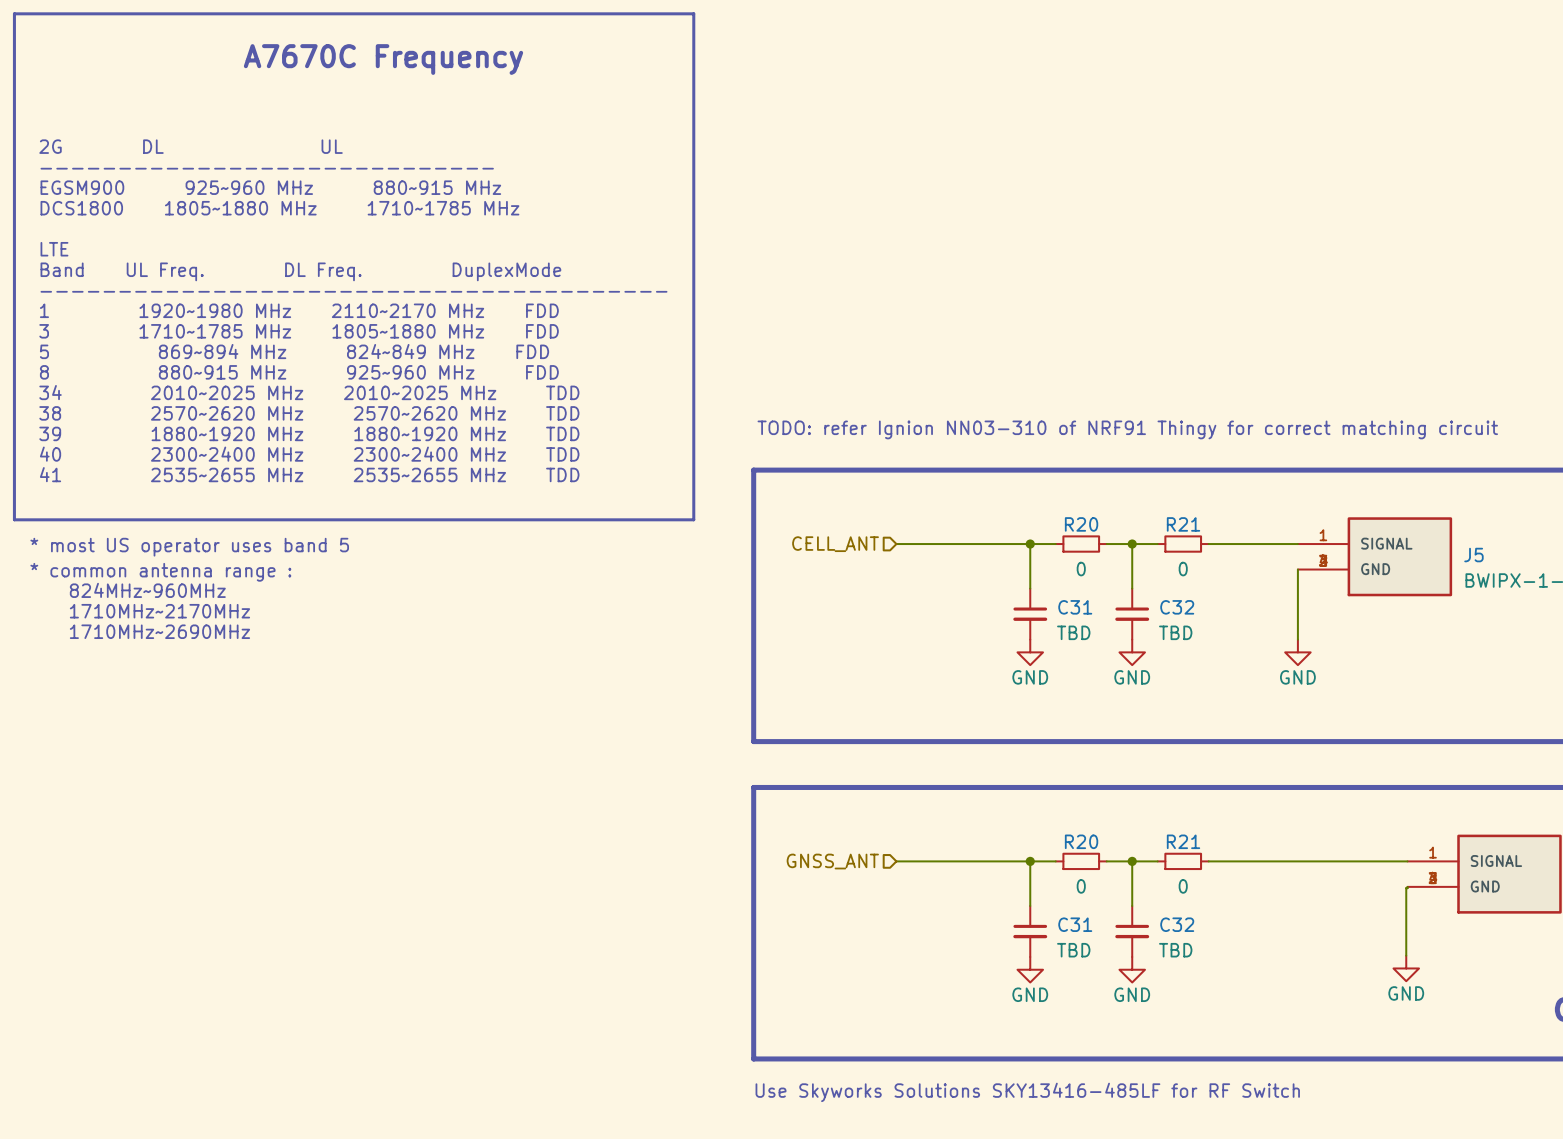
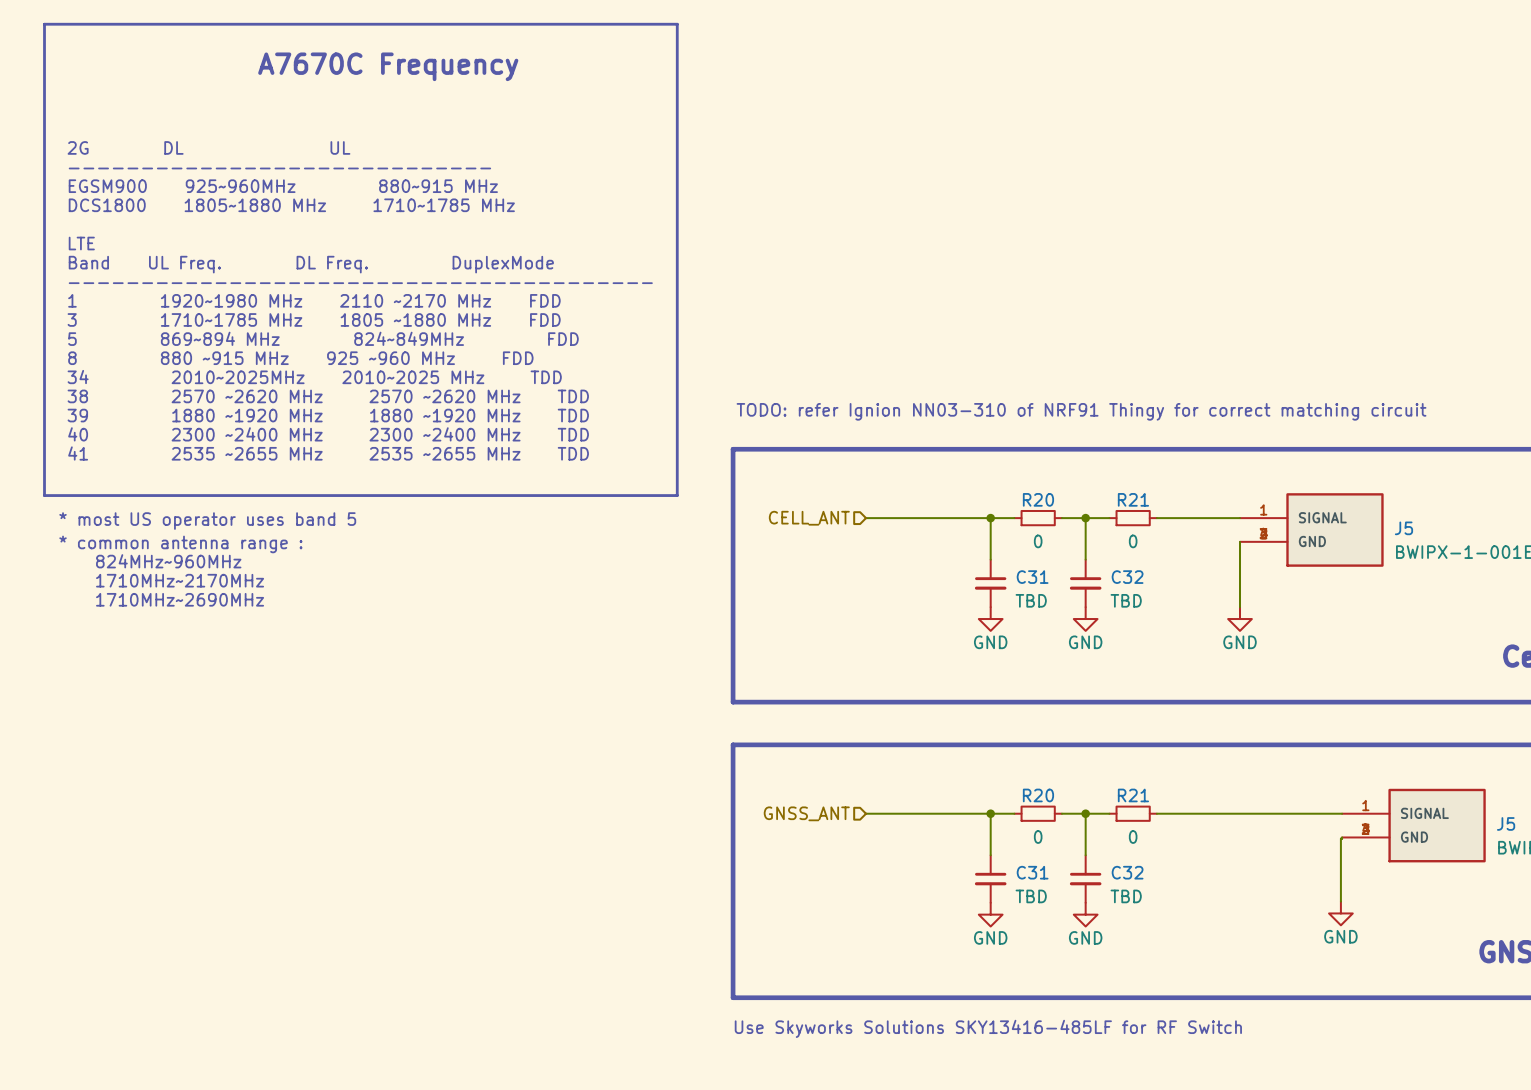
text: EGSM900 925~960 MHz 880~915 MHz (270, 187) -> EGSM900 925~960MHz 880~915 MHz (283, 186)
text: 1 1920~1980 MHz 2110~2170 MHz FDD (299, 310) -> 1 1920~1980 MHz 2110 ~2170 MHz FDD (314, 300)
text: 3 1710~1785 MHz 1805~1880 MHz FDD (299, 331) -> 3 1710~1785 MHz 1805 ~1880 MHz FDD (314, 319)
text: 5 869~894 MHz 824~849 MHz FDD (294, 351) -> 5 869~894 MHz 824~849MHz FDD (323, 338)
text: 8 880~915 MHz 925~960 MHz FDD (299, 372) -> 8 880 ~915 MHz 925 ~960 MHz FDD (300, 358)
text: 34 2010~2025 MHz 2010~2025 MHz TDD (309, 392) -> 34 2010~2025MHz 2010~2025 MHz TDD (314, 377)
text: 38 2570~2620 MHz 2570~2620 MHz TDD (309, 413) -> 38 2570 ~2620 MHz 2570 ~2620 MHz TDD (328, 396)
text: 39 1880~1920 MHz 1880~1920 MHz TDD (309, 433) -> 39 1880 ~1920 MHz 1880 ~1920 MHz TDD (328, 415)
text: 40 2300~2400 MHz 2300~2400 MHz TDD (309, 454) -> 40 2300 ~2400 MHz 2300 ~2400 MHz TDD (328, 434)
text: 41 2535~2655 MHz 2535~2655 MHz TDD (309, 474) -> 41 2535 ~2655 MHz 2535 ~2655 MHz TDD (328, 453)

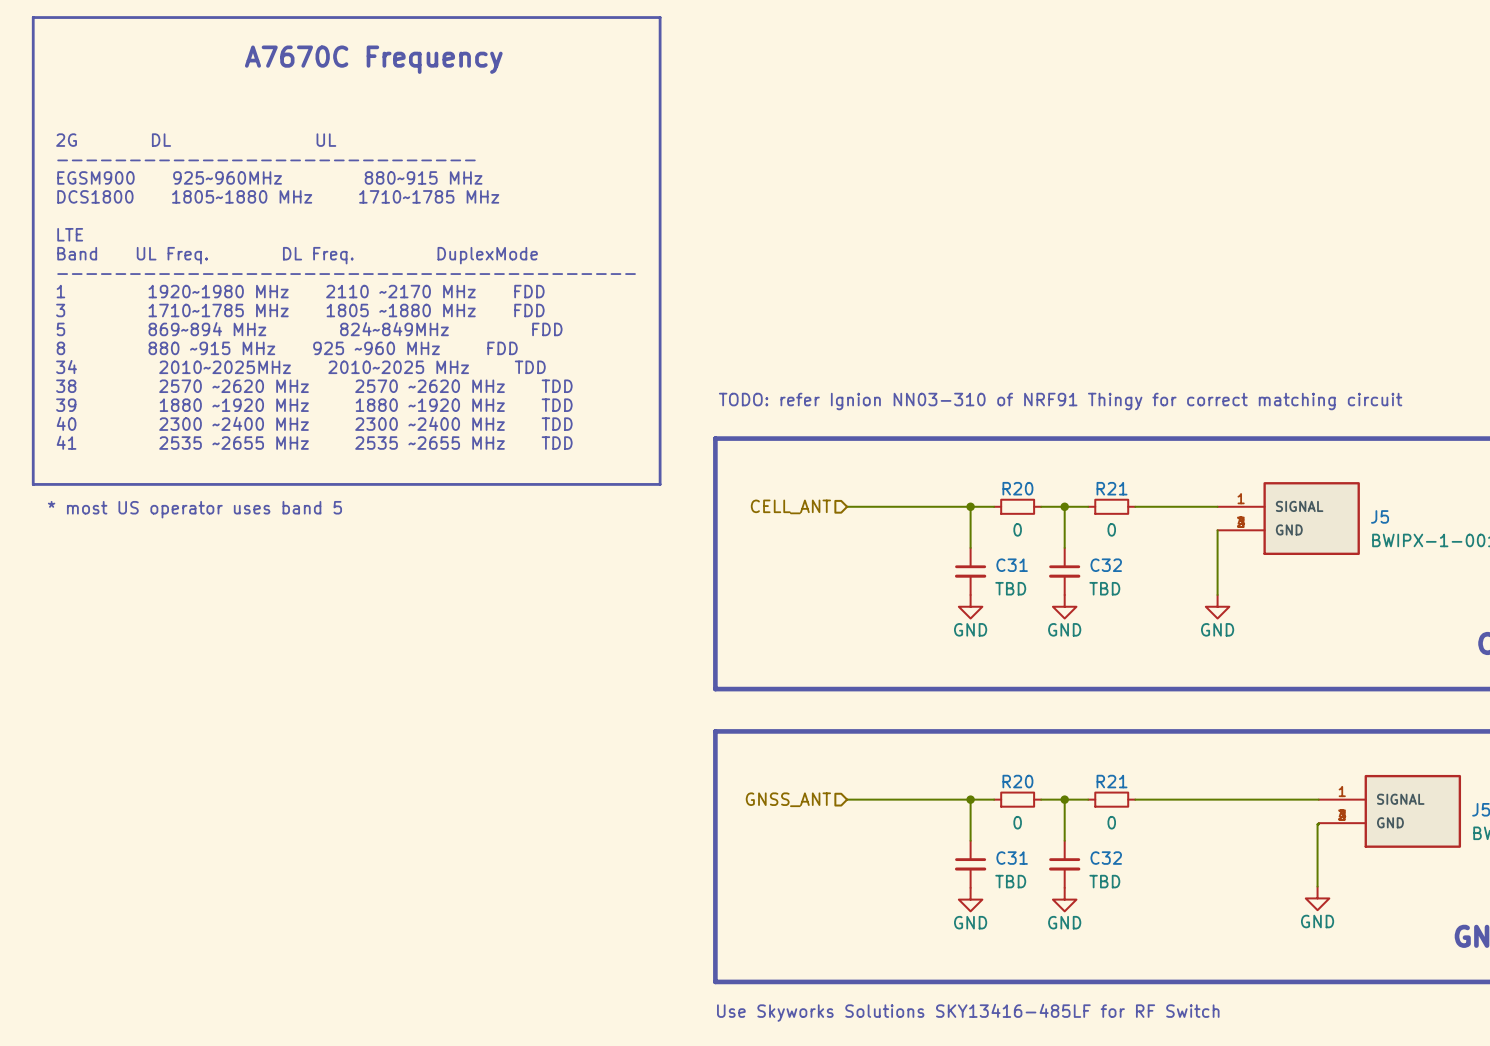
text: * common antenna range : (180, 544) -> none
text: 824MHz~960MHz (168, 561) -> none
text: 1710MHz~2170MHz (180, 580) -> none
text: 1710MHz~2690MHz (180, 599) -> none

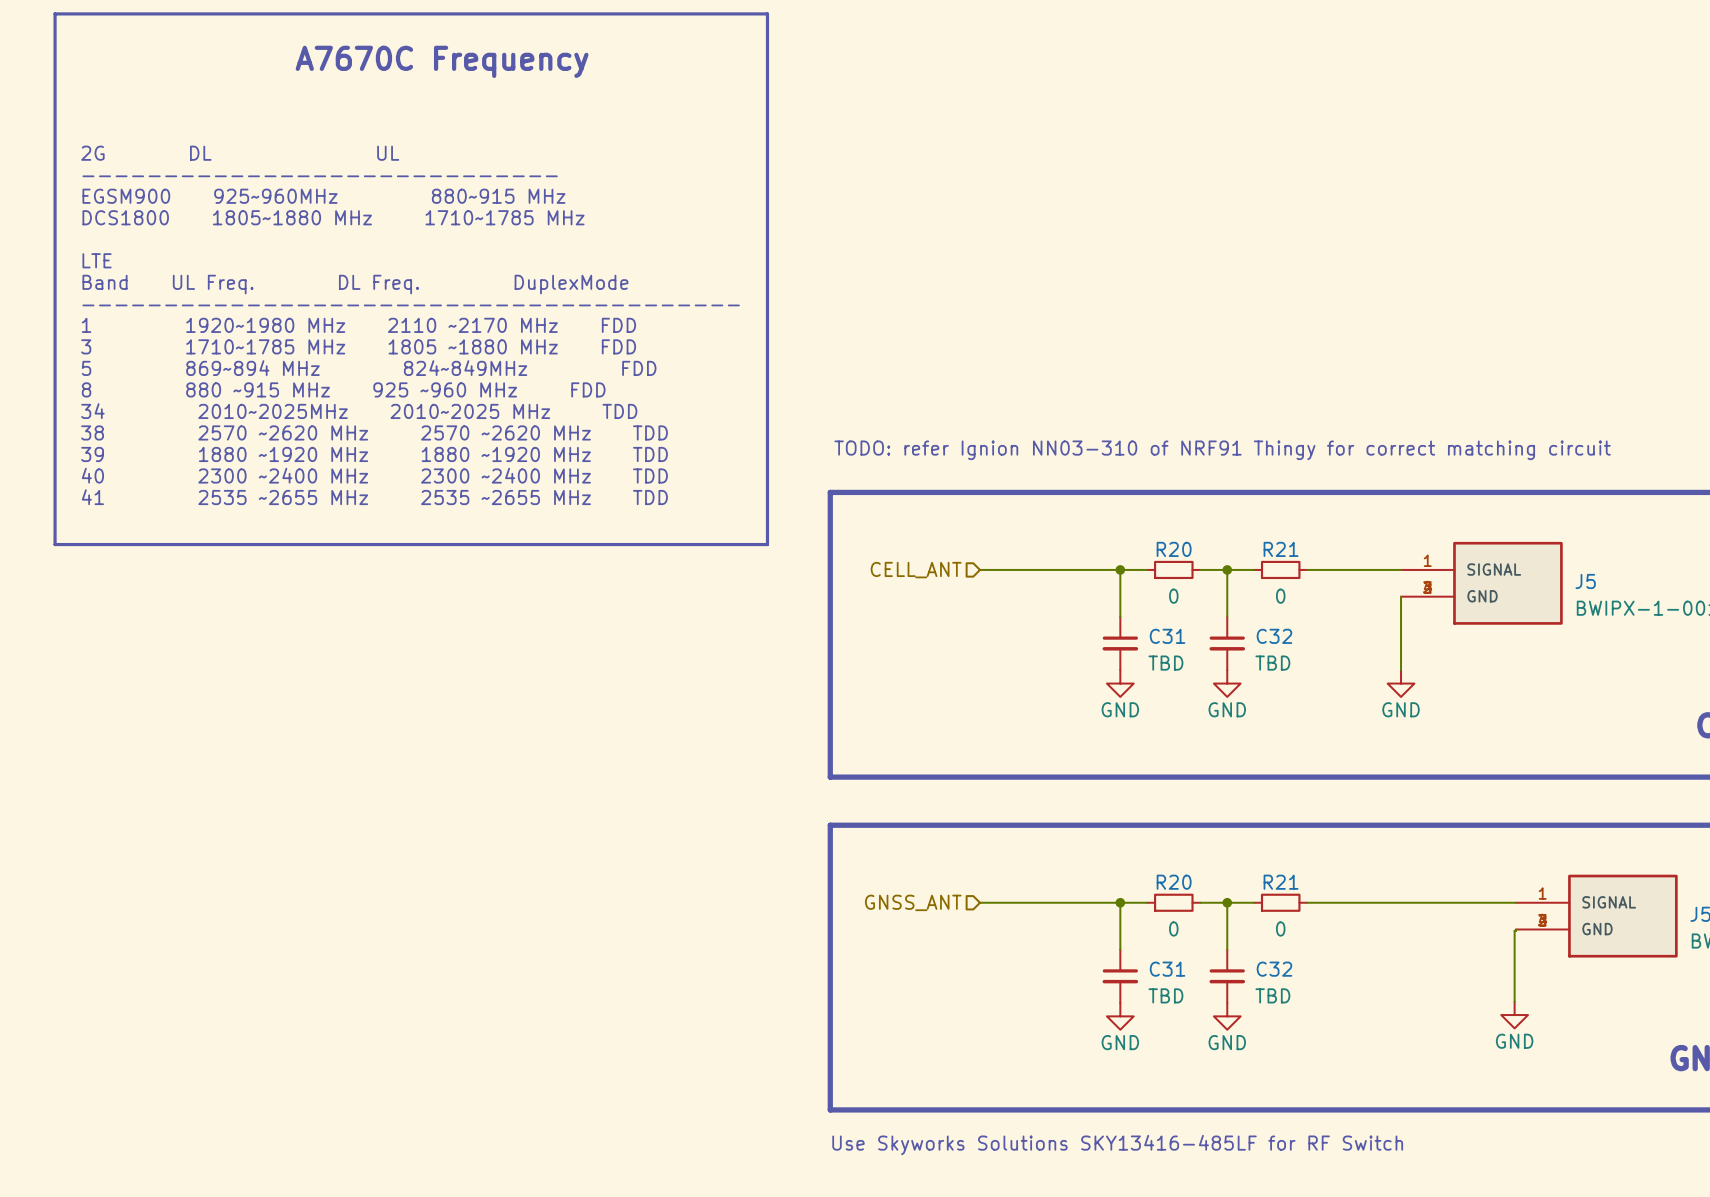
text: * most US operator uses band 5 (194, 509) -> none

